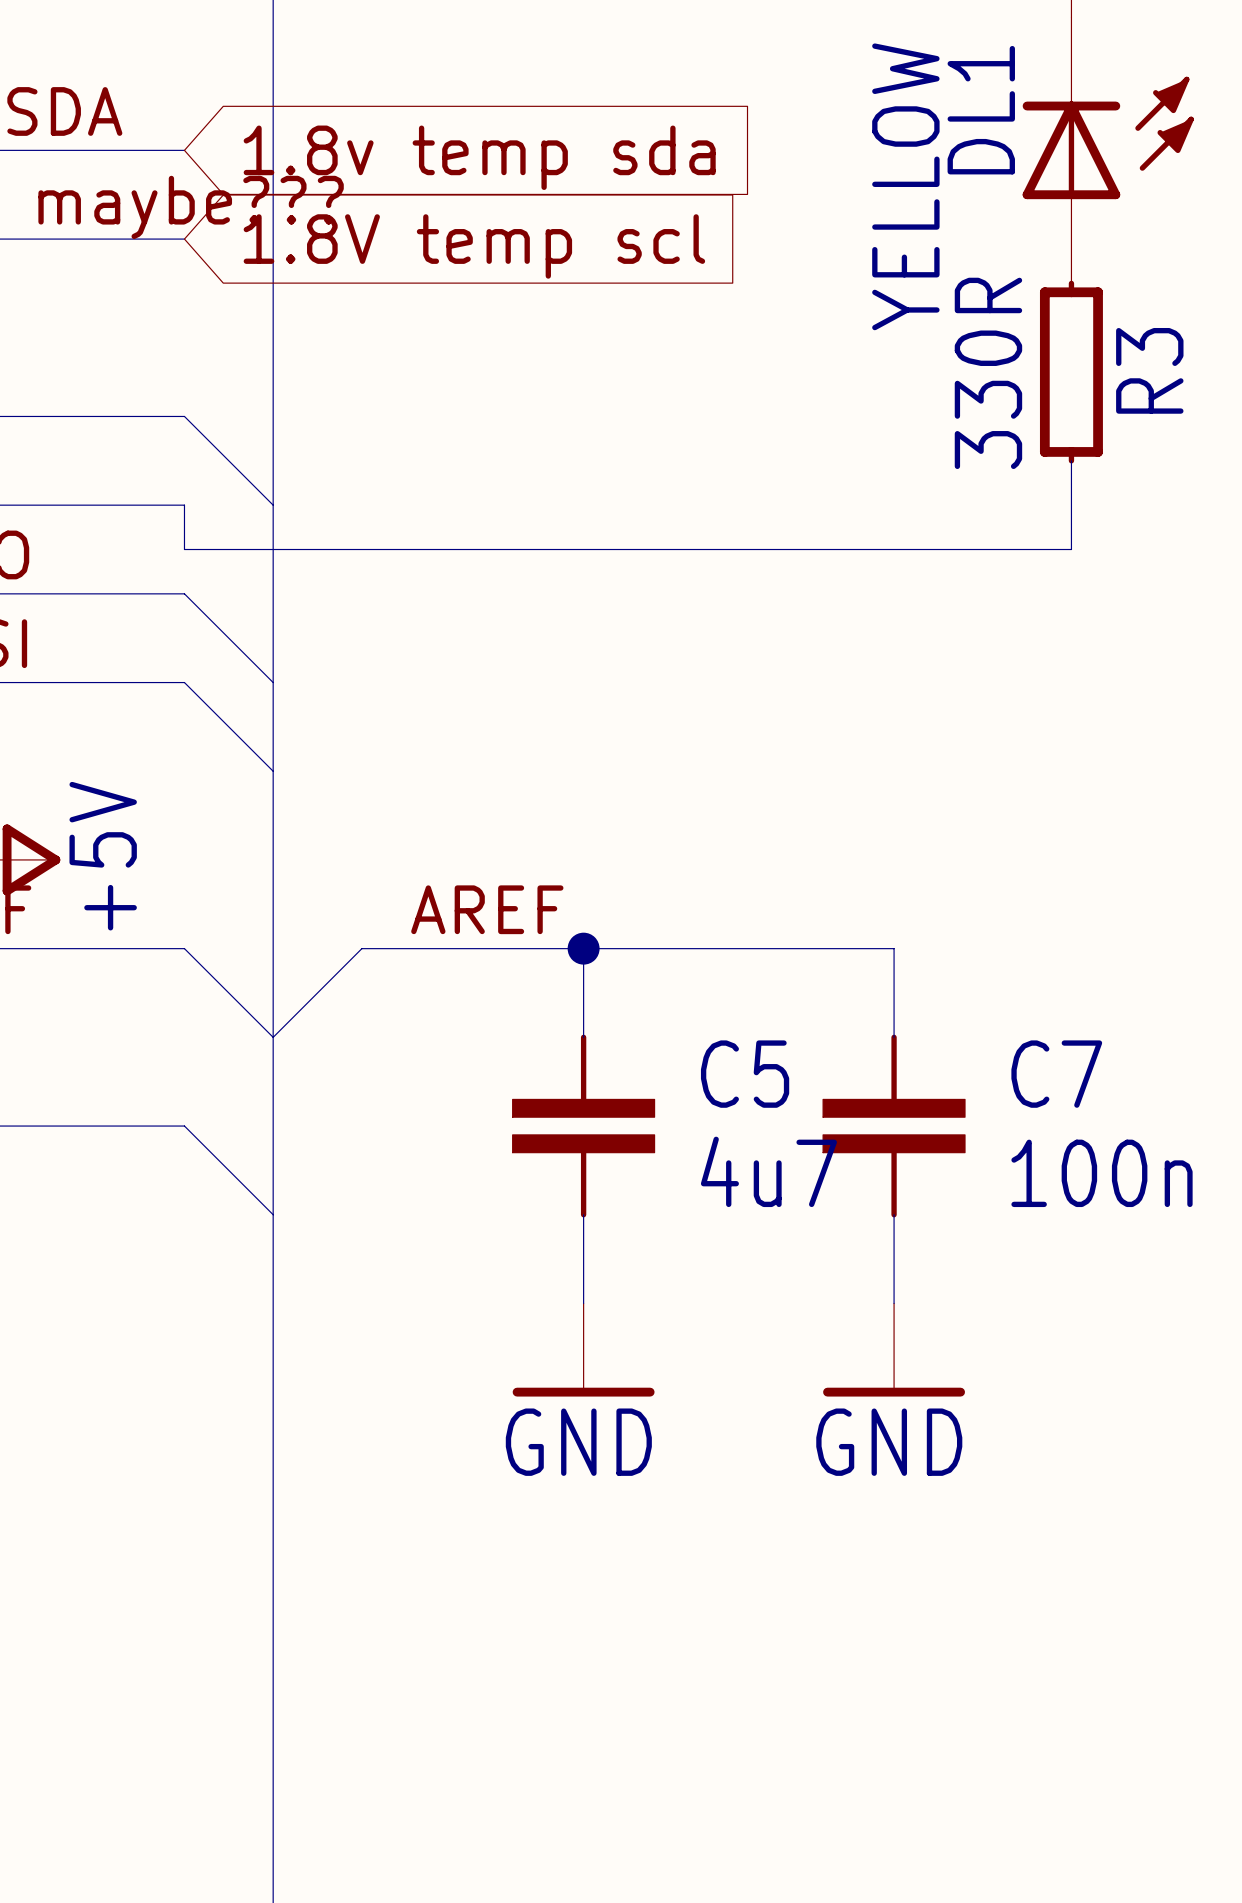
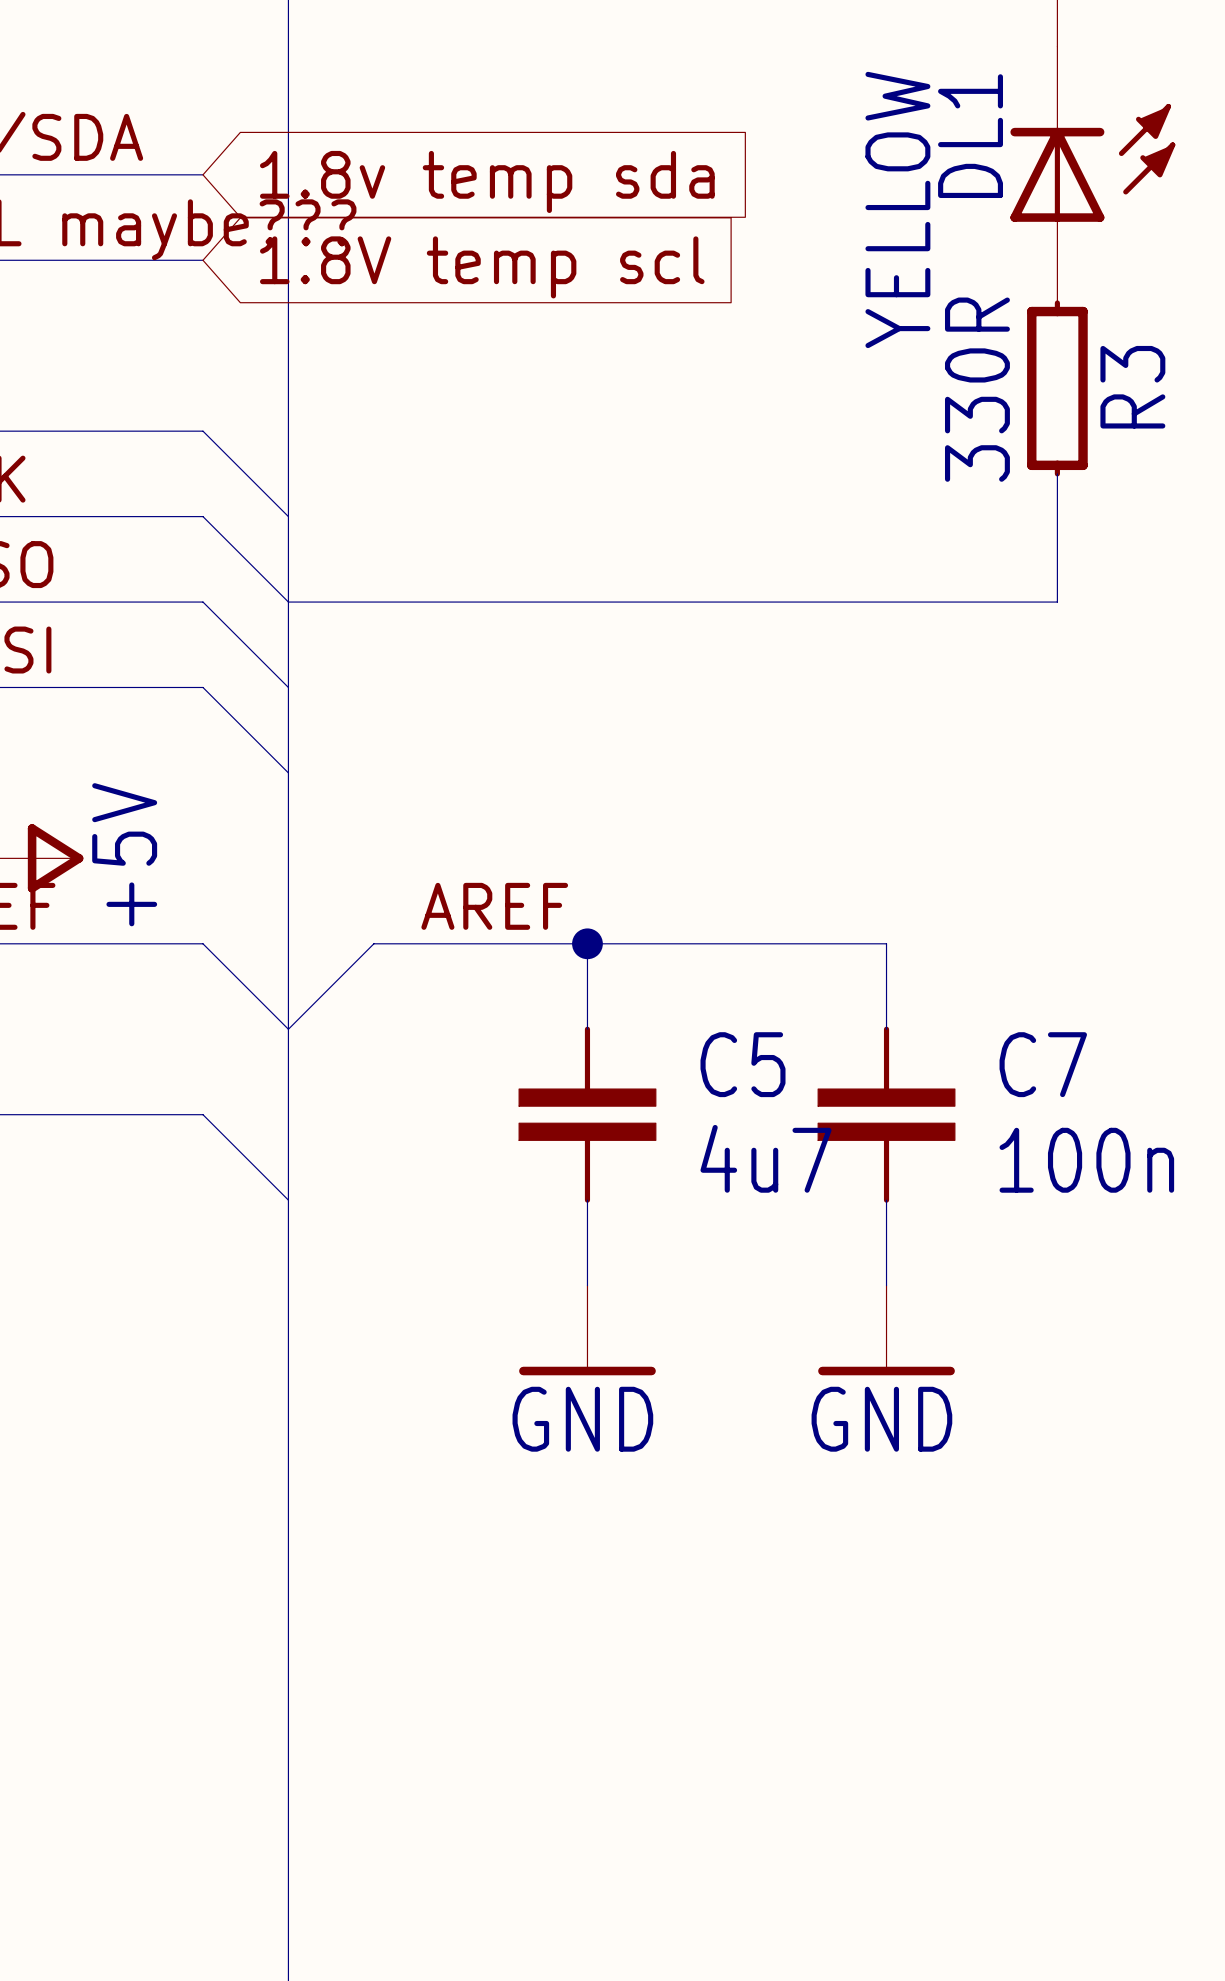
wire: (184, 505) (184, 549) (1071, 549) -> (202, 516) (288, 602) (1057, 602) (1057, 559)

